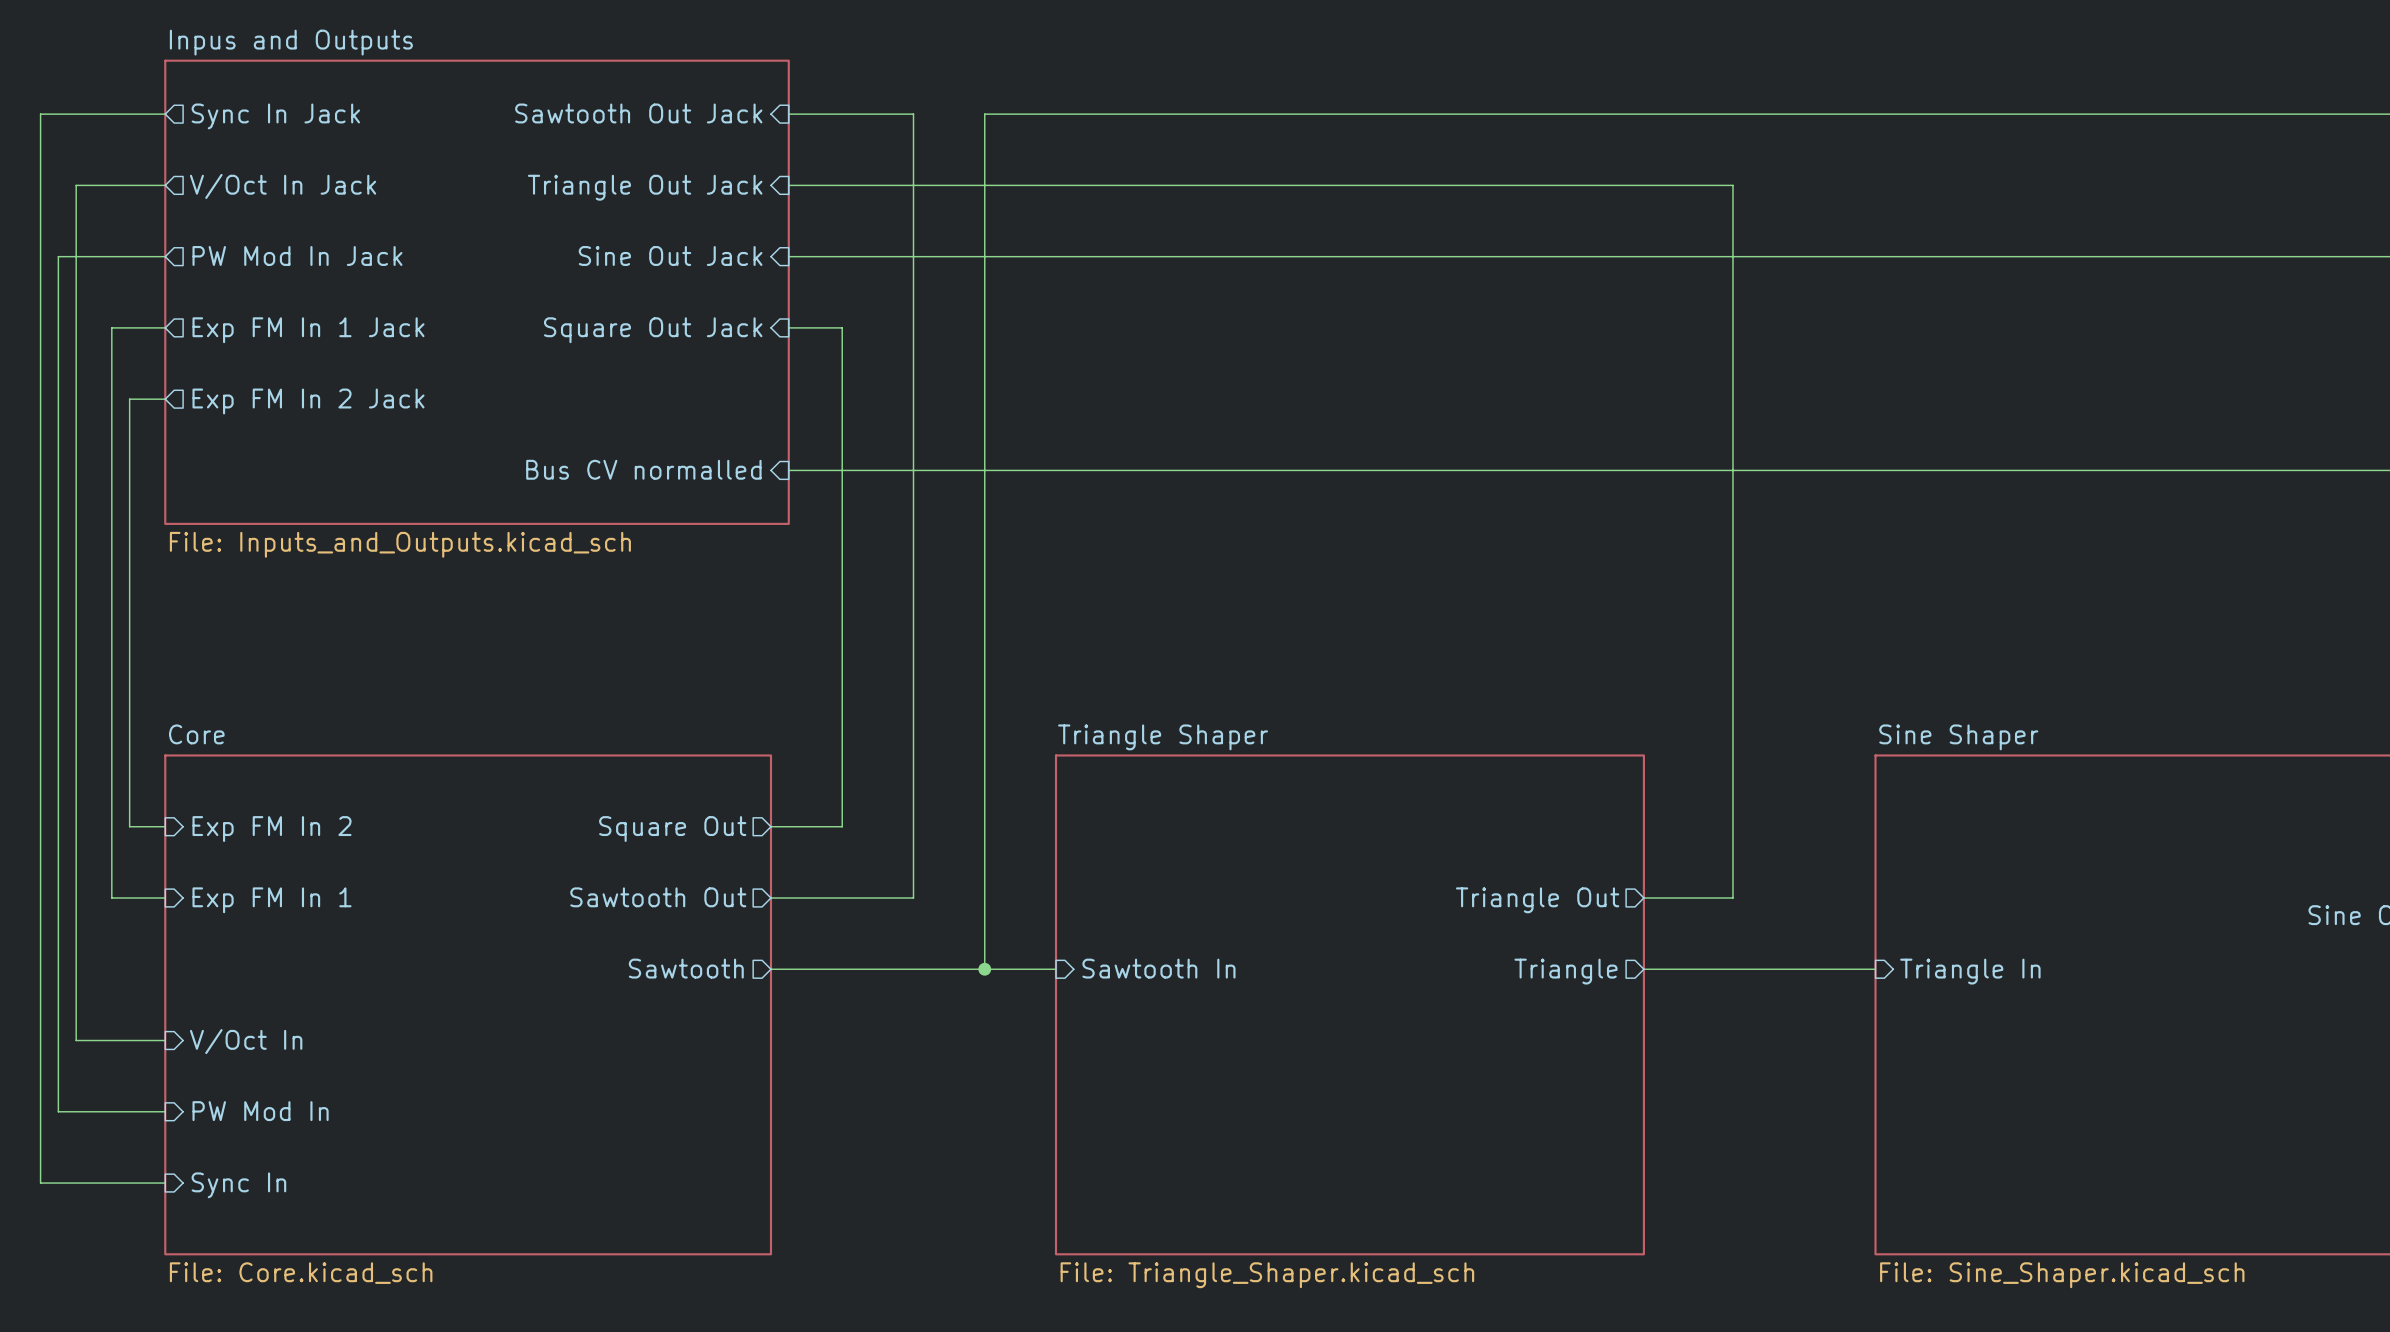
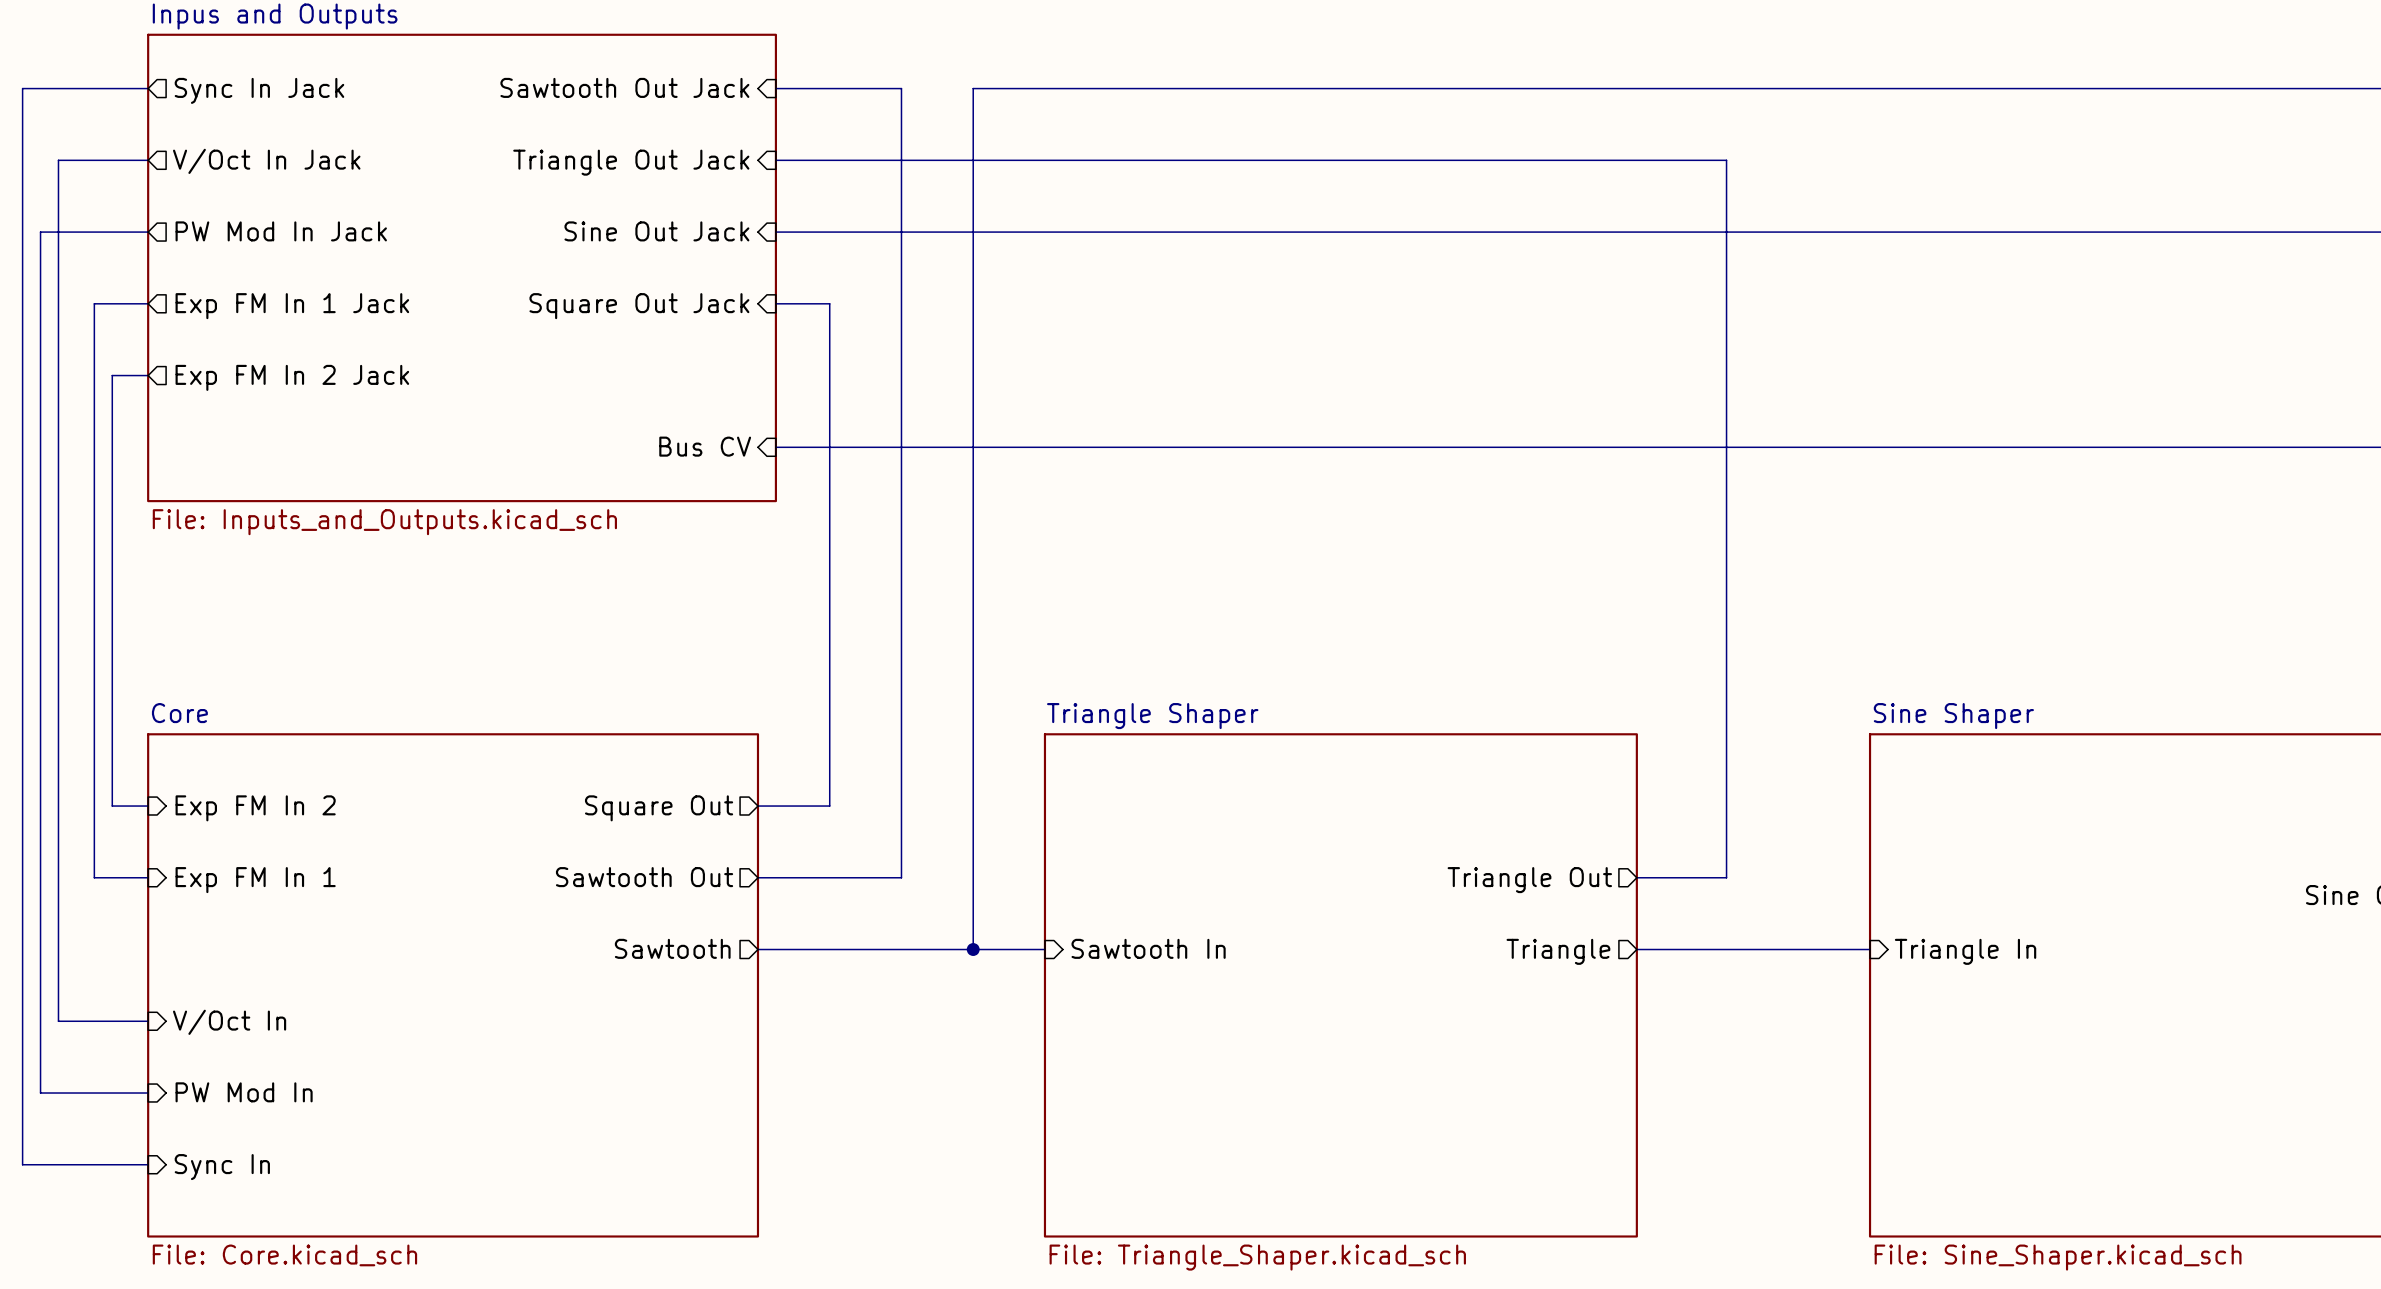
sheet pin: Bus CV normalled (643, 469) -> Bus CV (705, 446)

